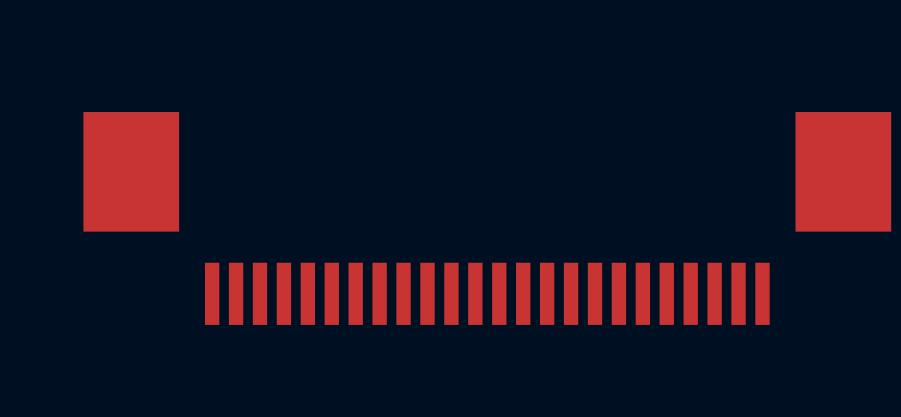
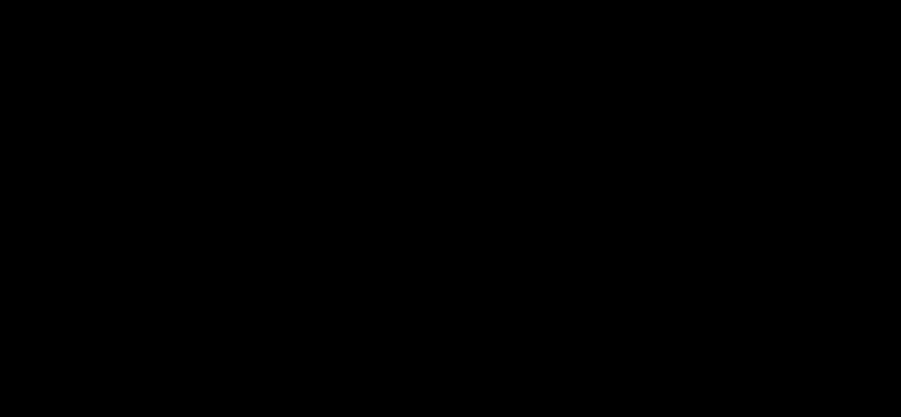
part: (487, 218) -> none

